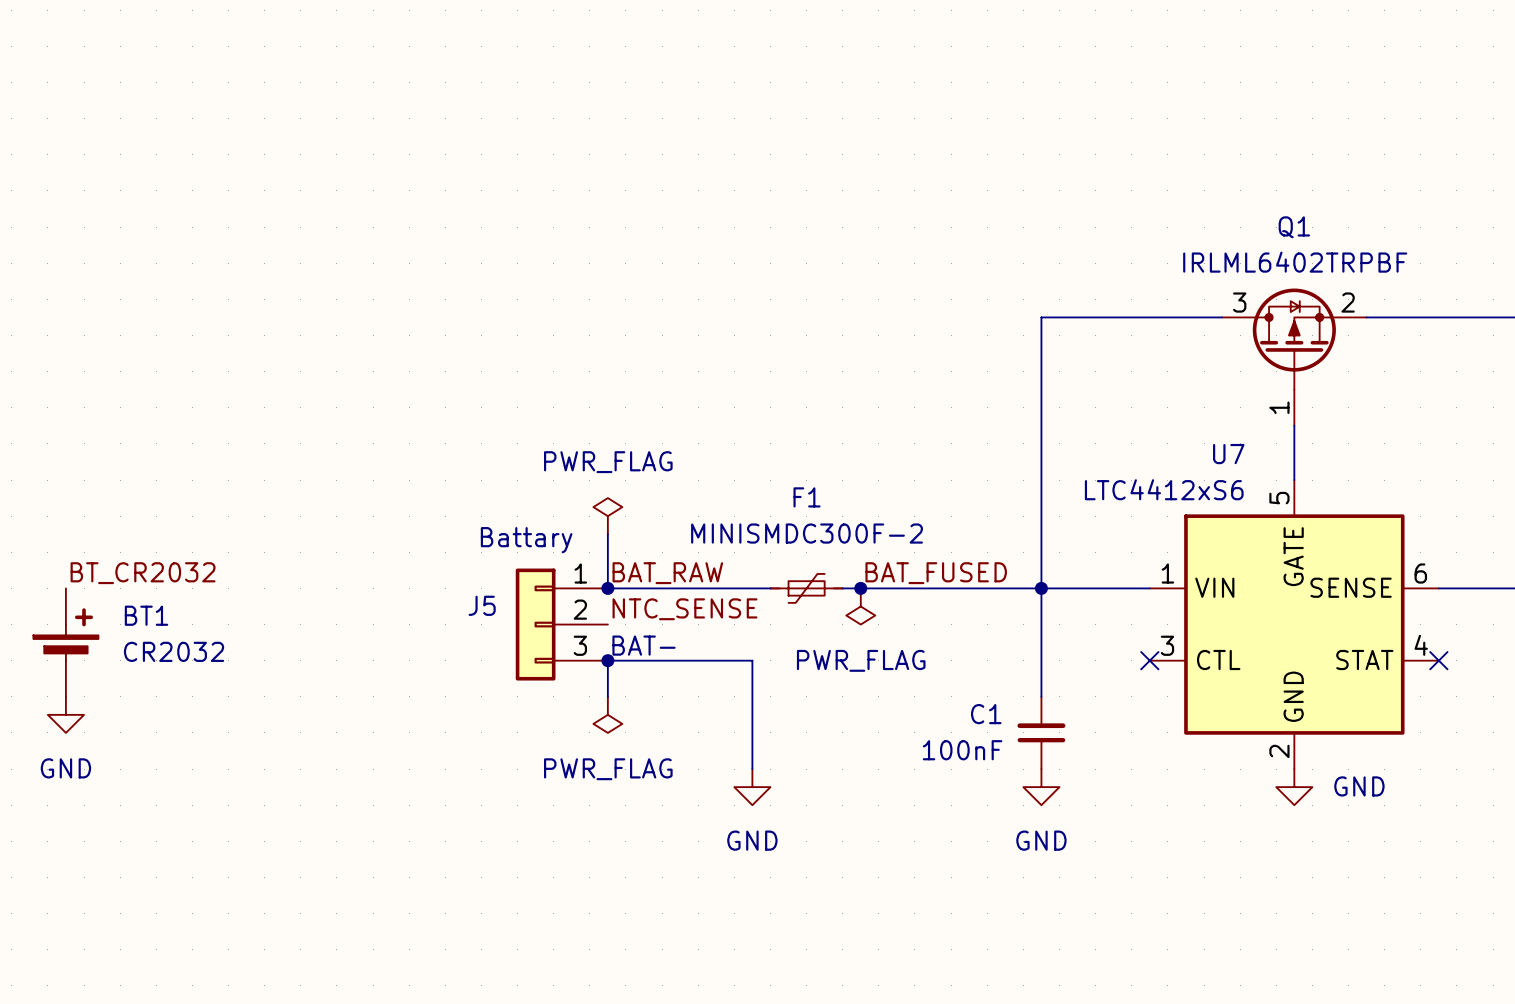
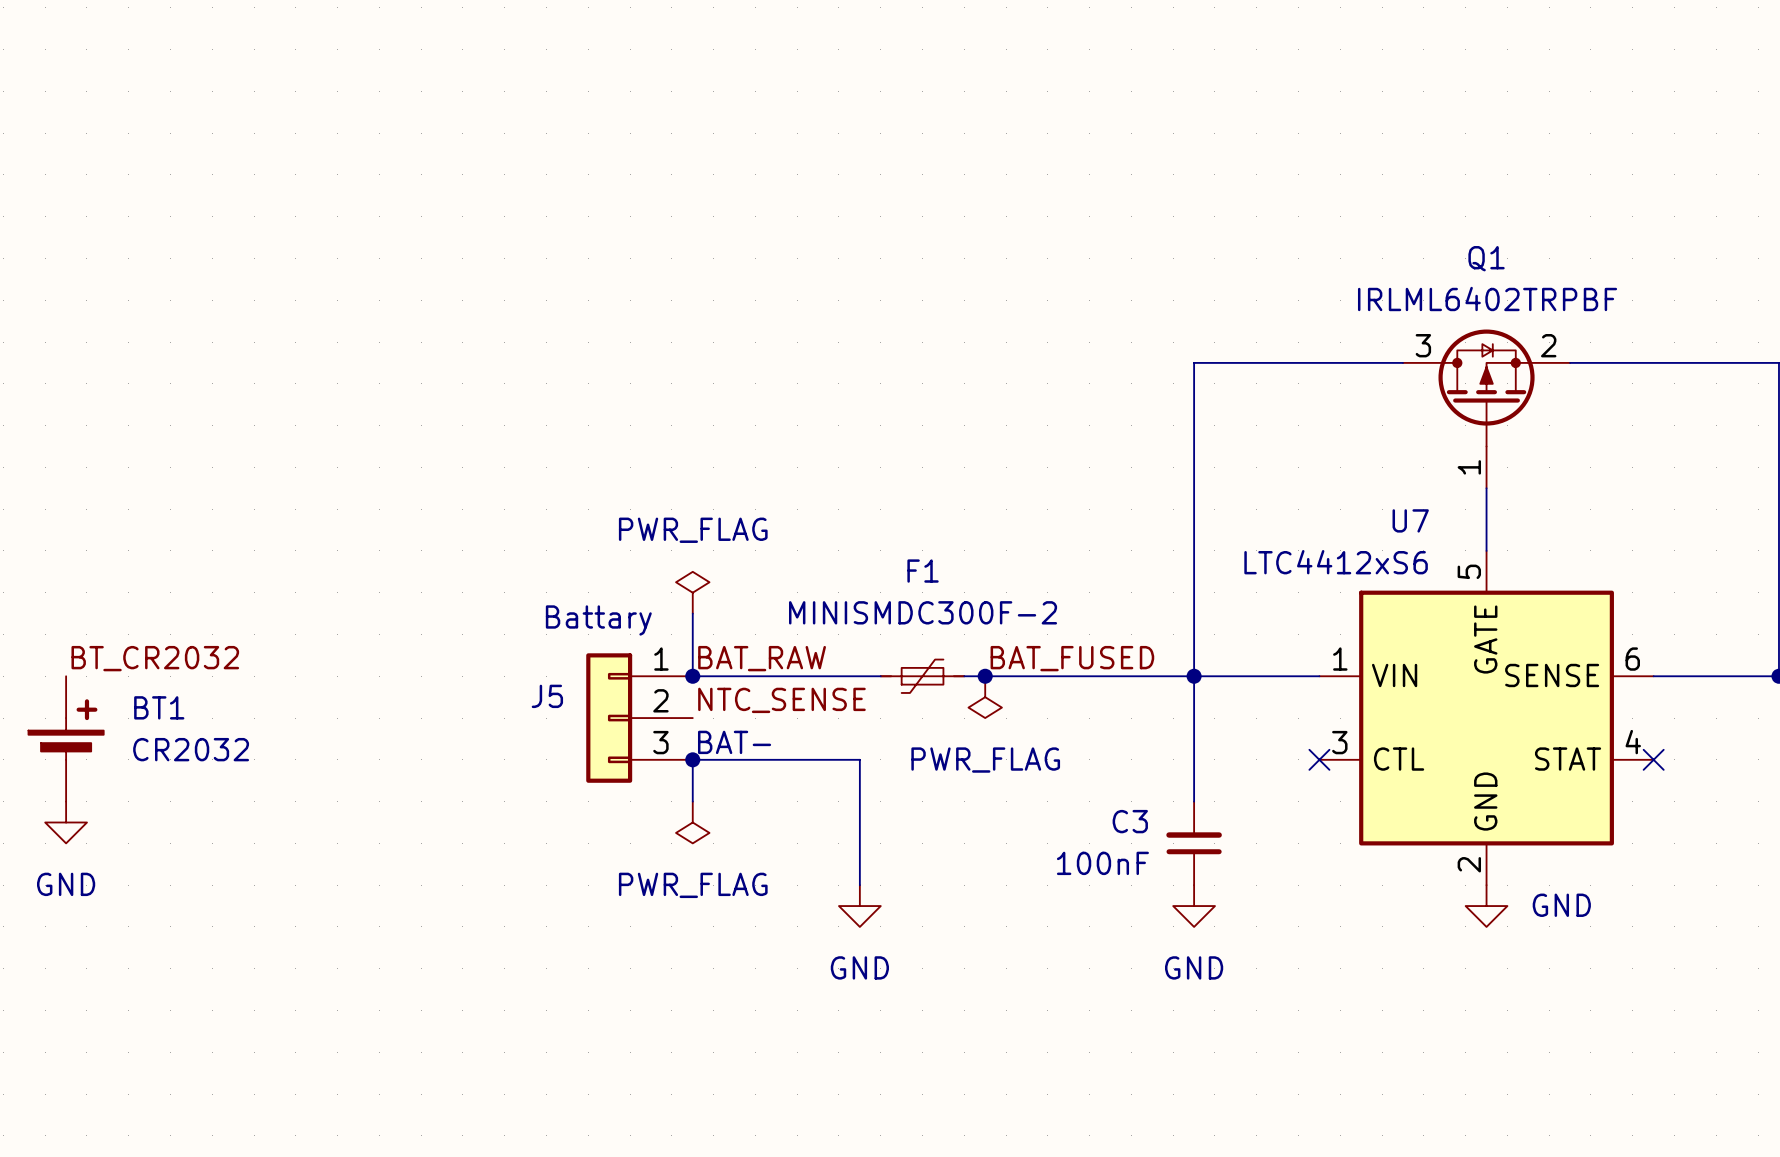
C1 name: C1 (986, 714) -> C3 (1130, 821)

